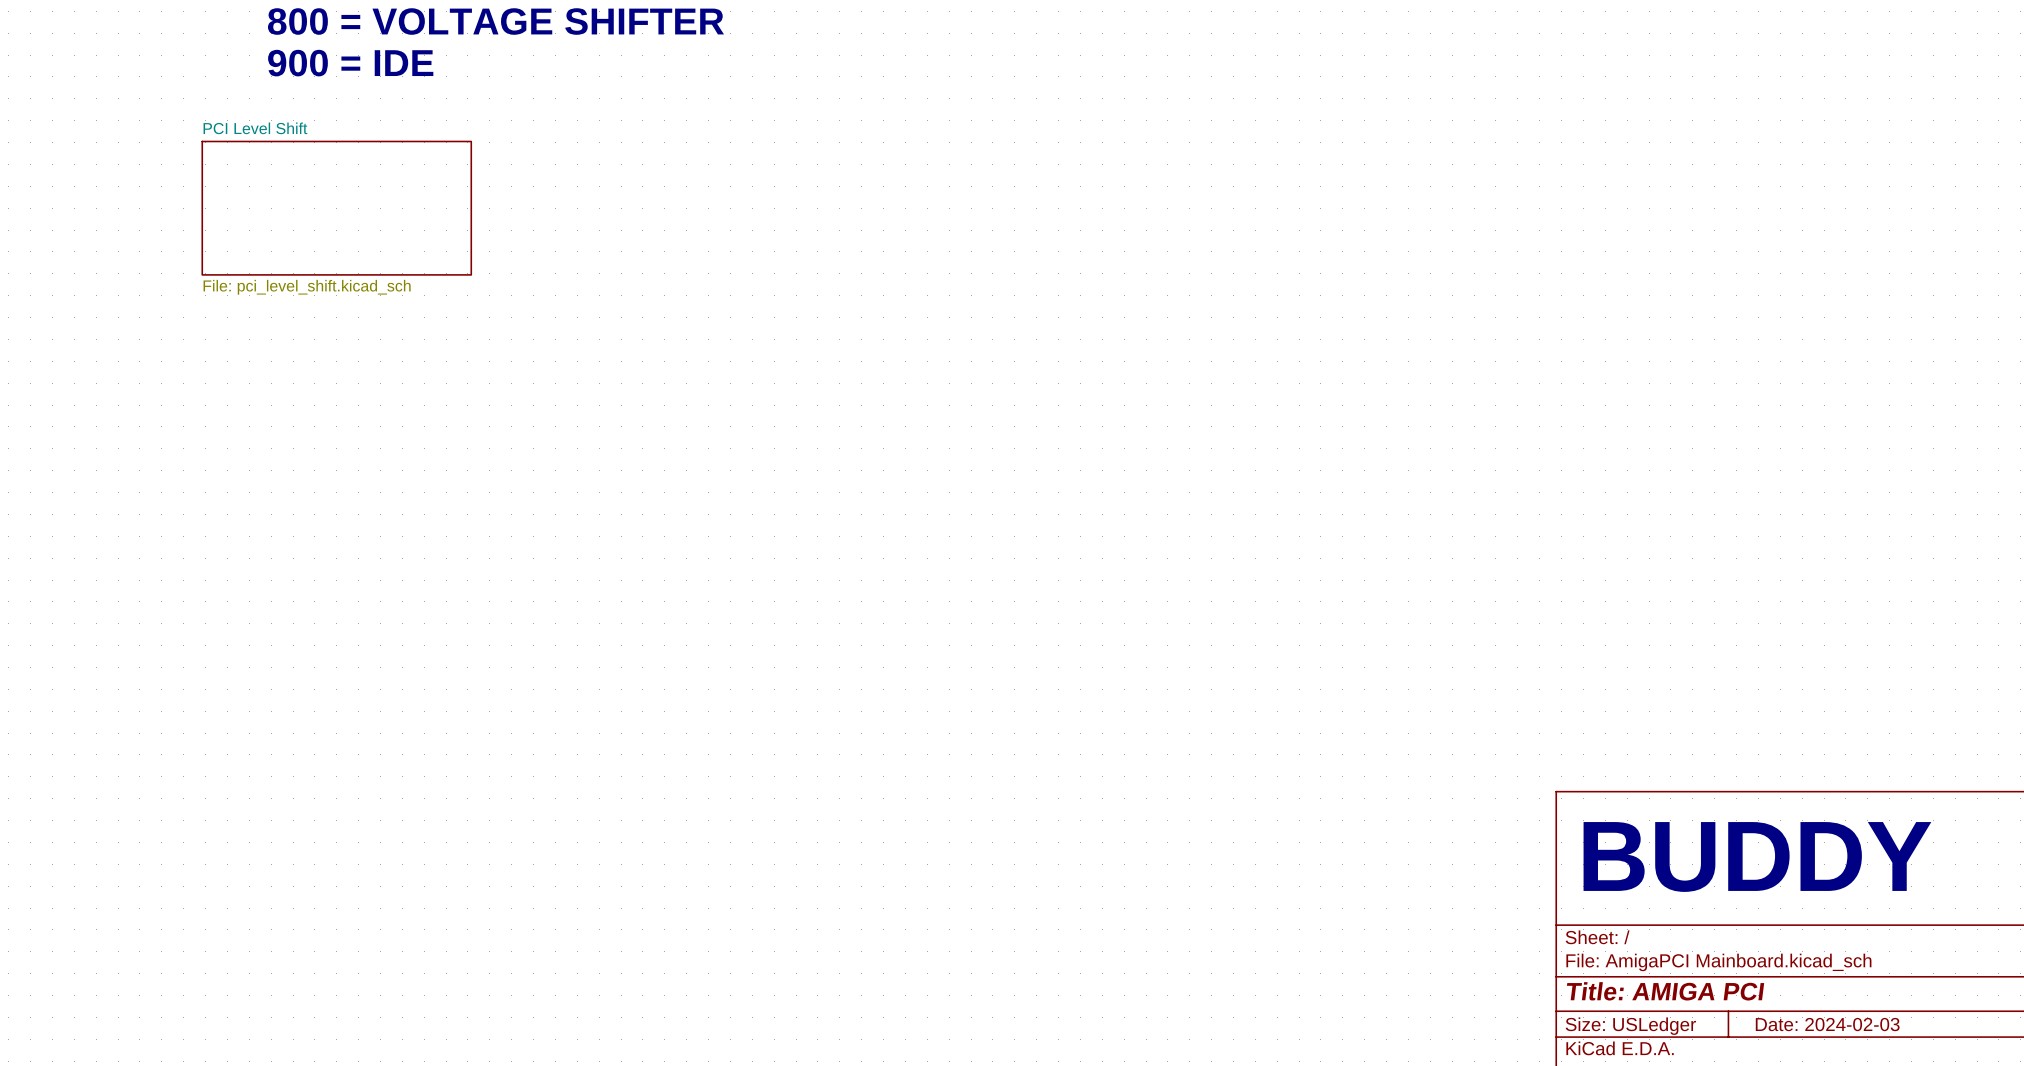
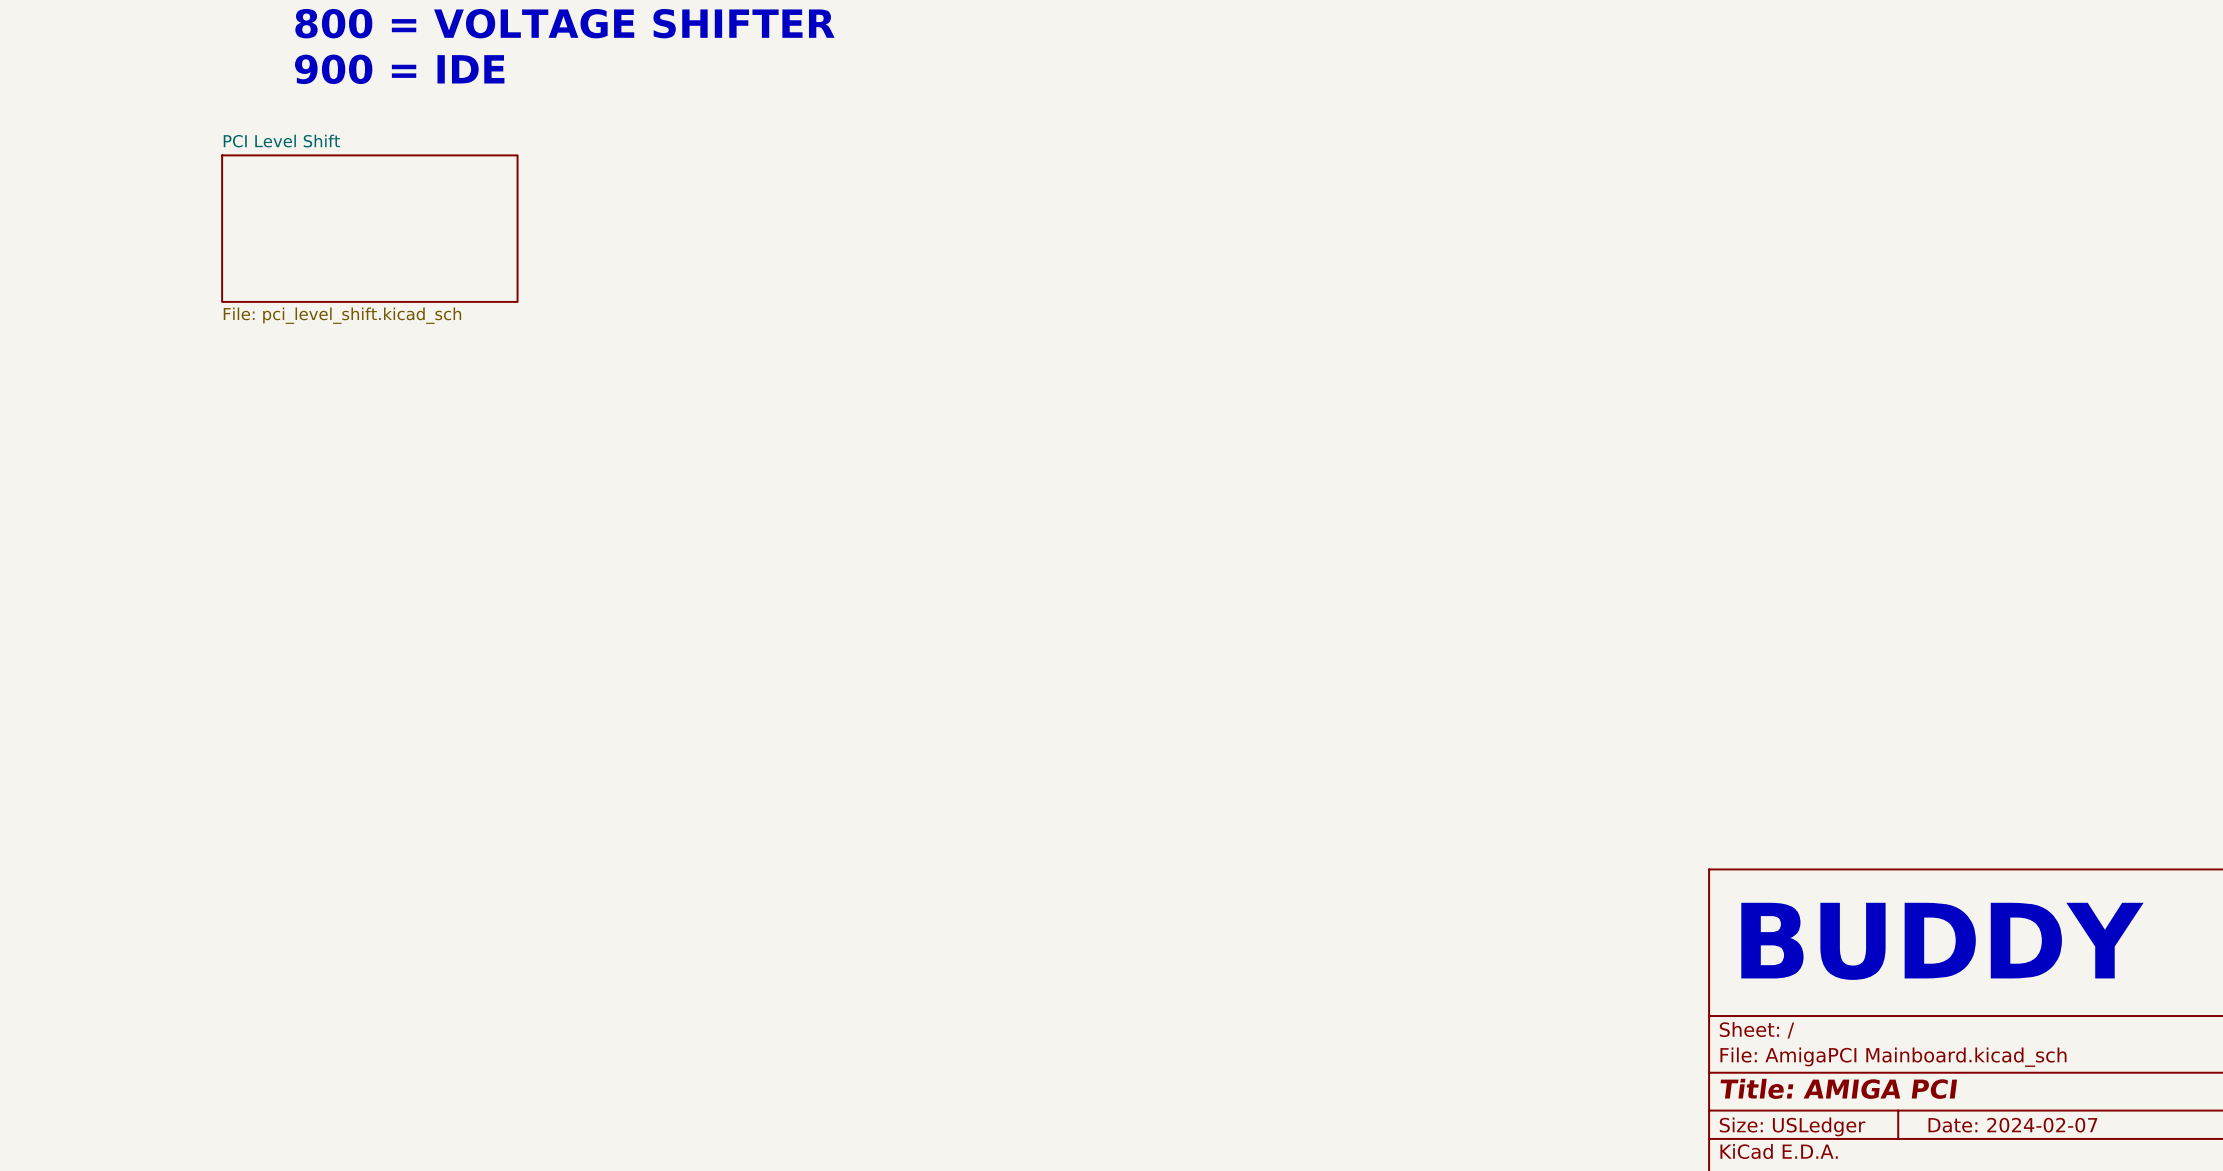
title block: Date: 2024-02-03 (1827, 1024) -> Date: 2024-02-07 (2012, 1125)

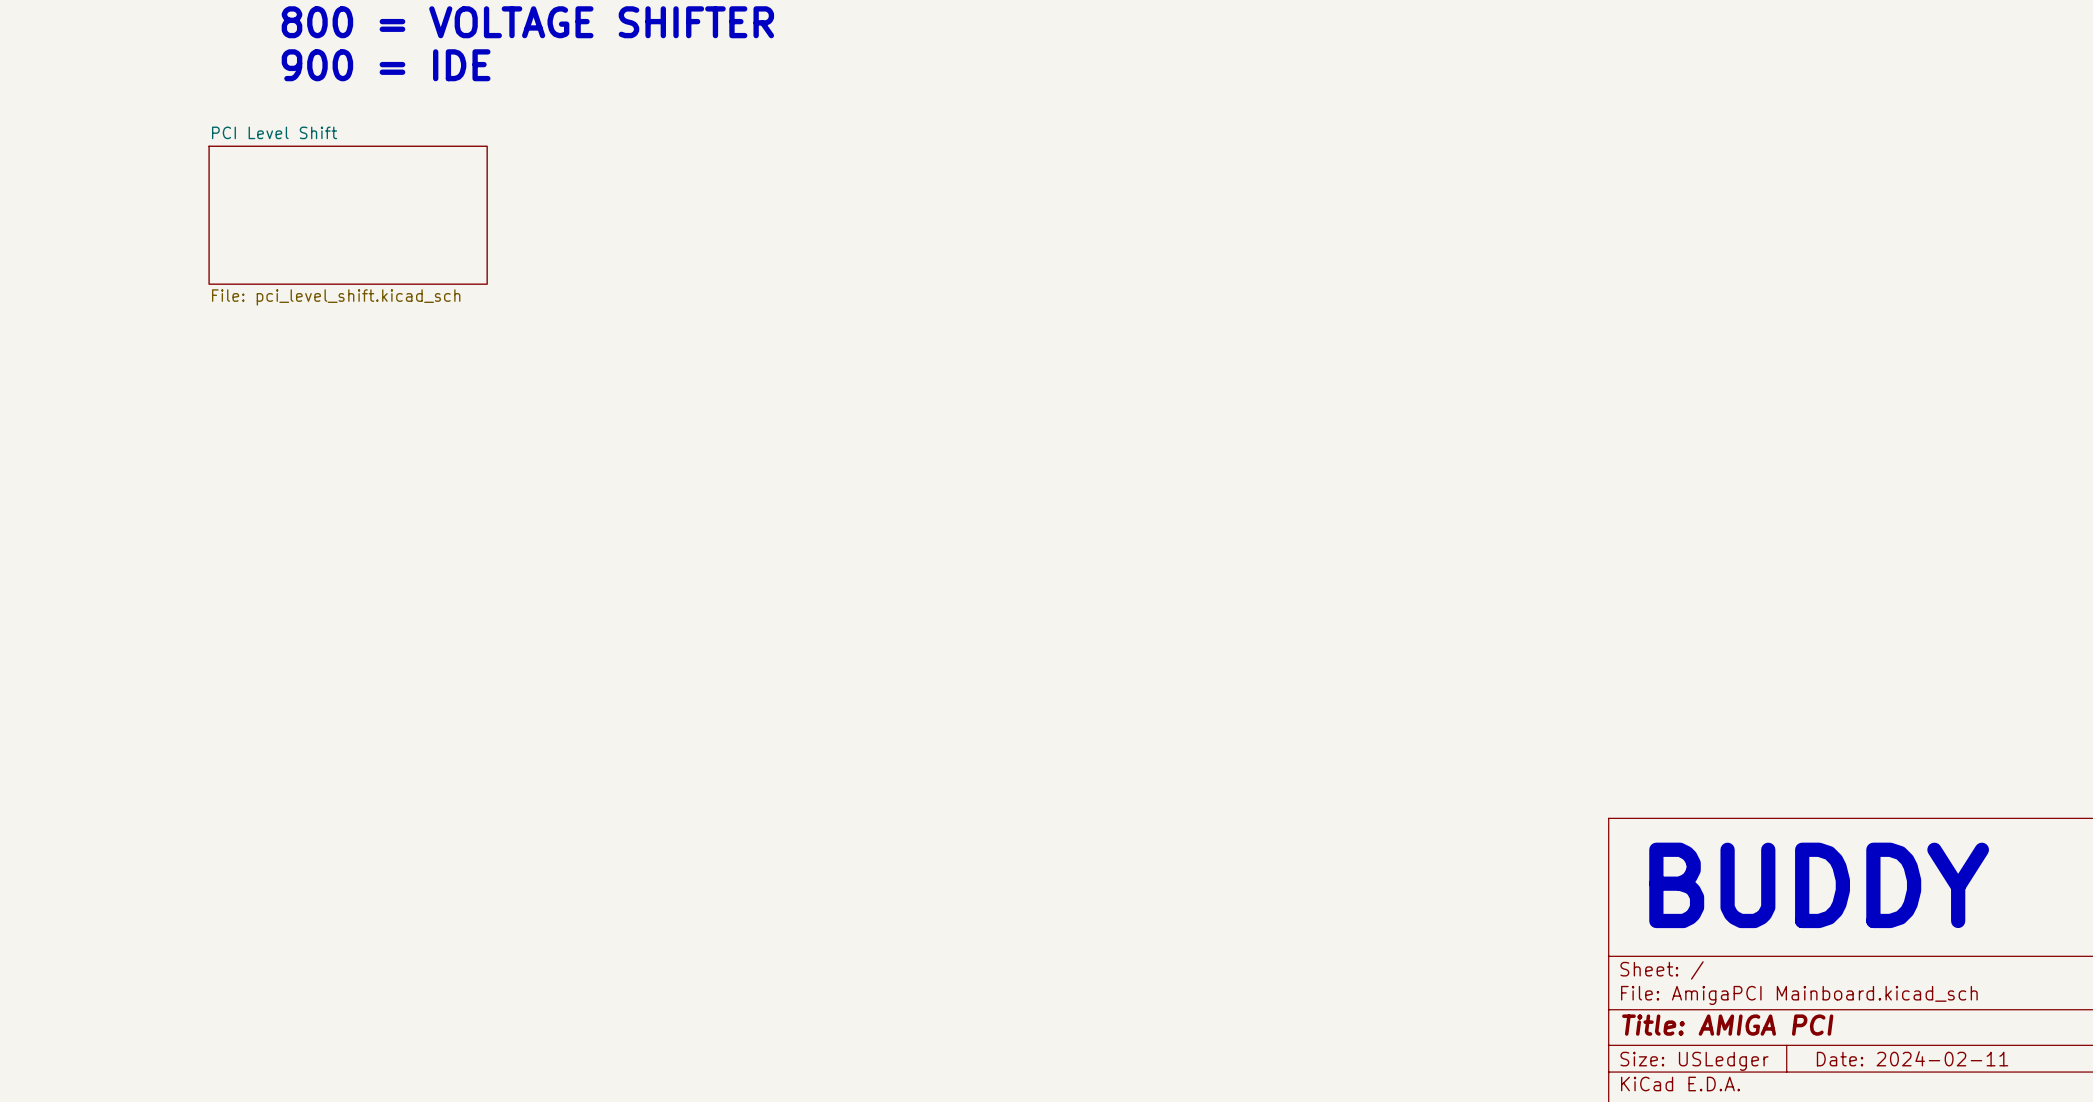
title block: Date: 2024-02-07 (2012, 1125) -> Date: 2024-02-11 (1912, 1058)

